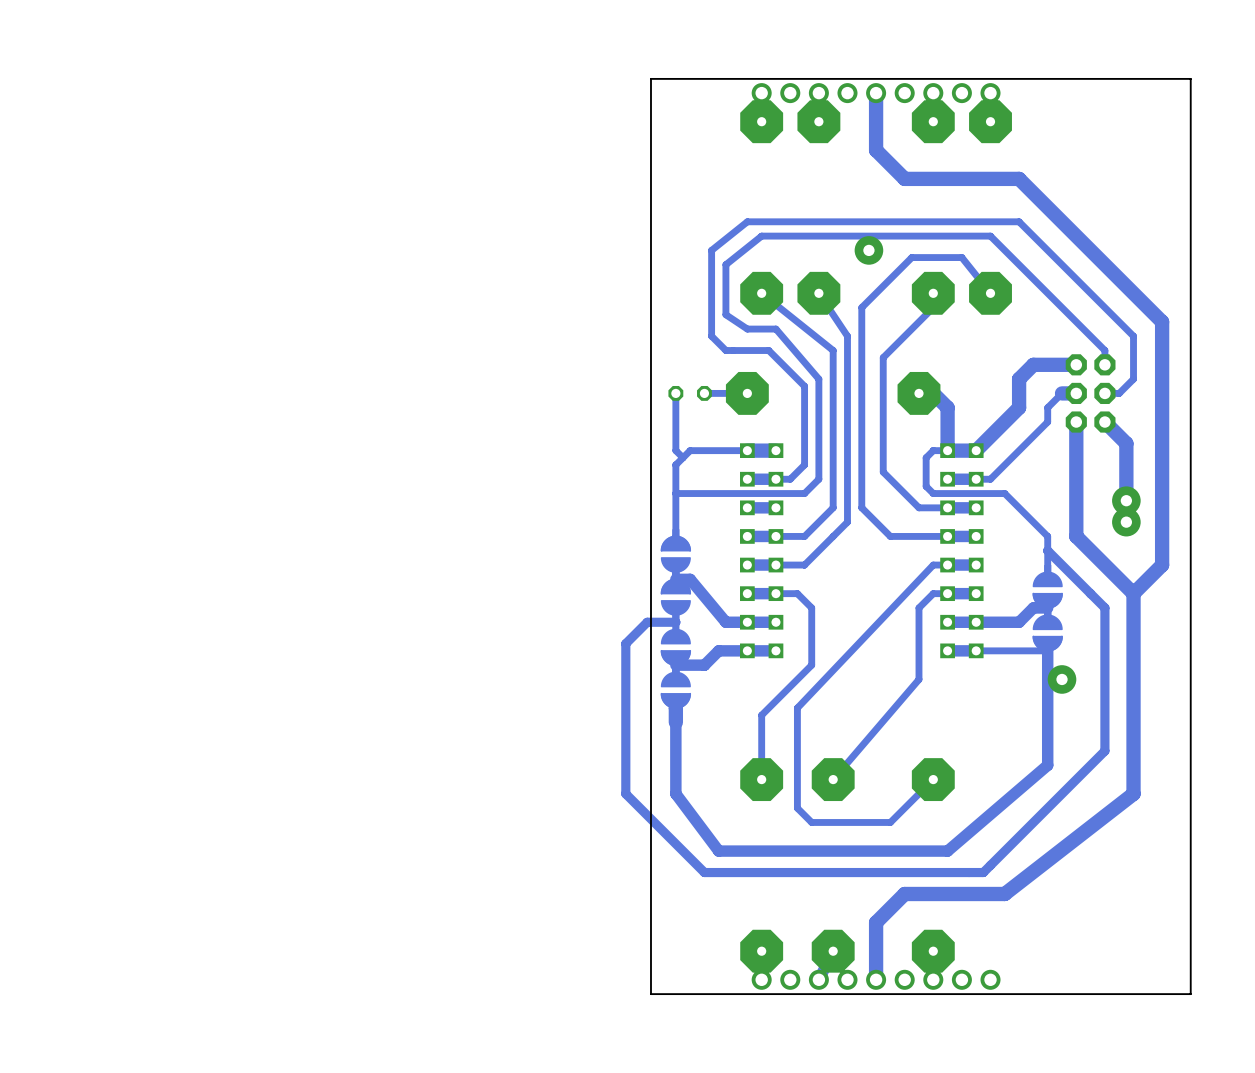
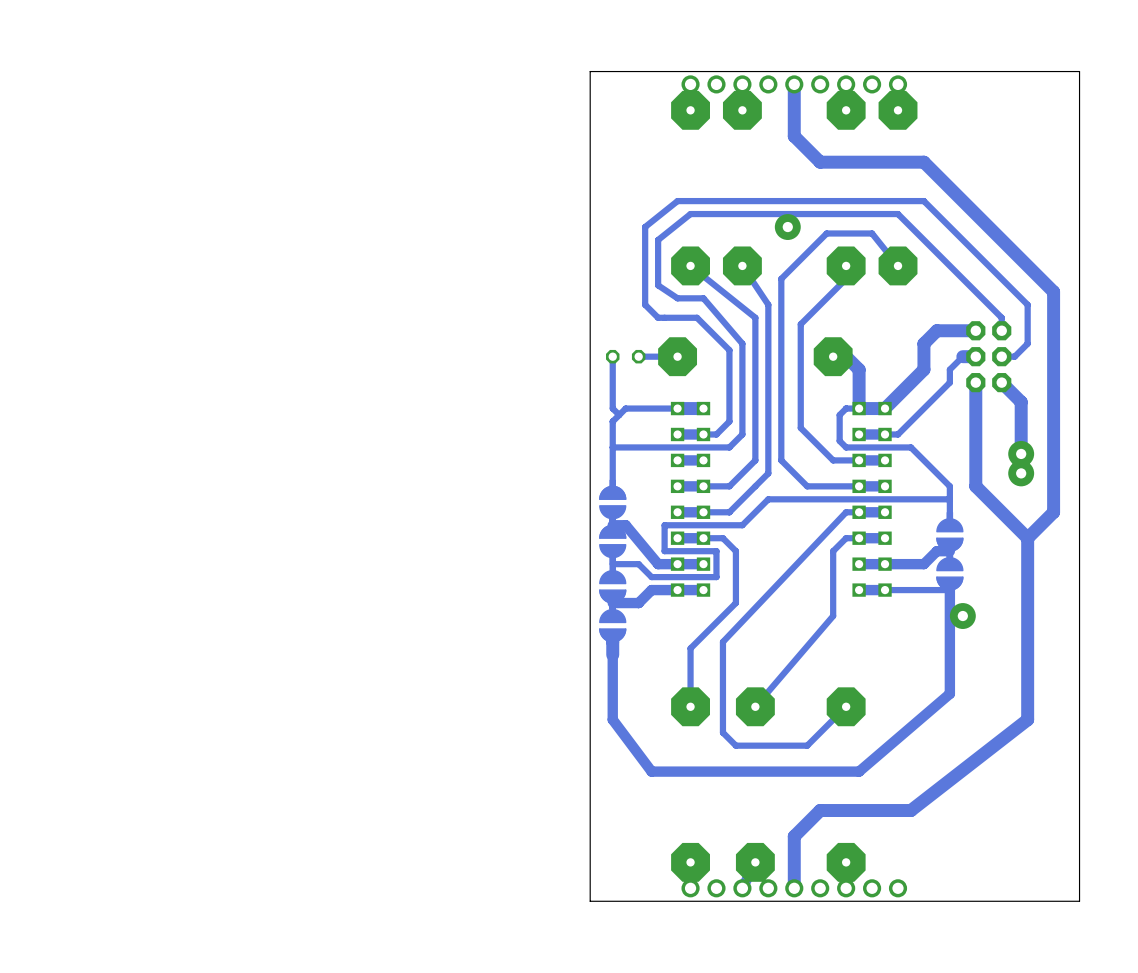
bottom track: (1047, 550) (1104, 607) (1104, 750) (983, 872) (704, 872) (625, 793) (625, 643) (647, 622) (675, 622) -> (949, 499) (768, 499) (742, 525) (664, 525) (664, 551) (716, 551) (716, 577) (651, 577) (638, 564) (612, 564)

